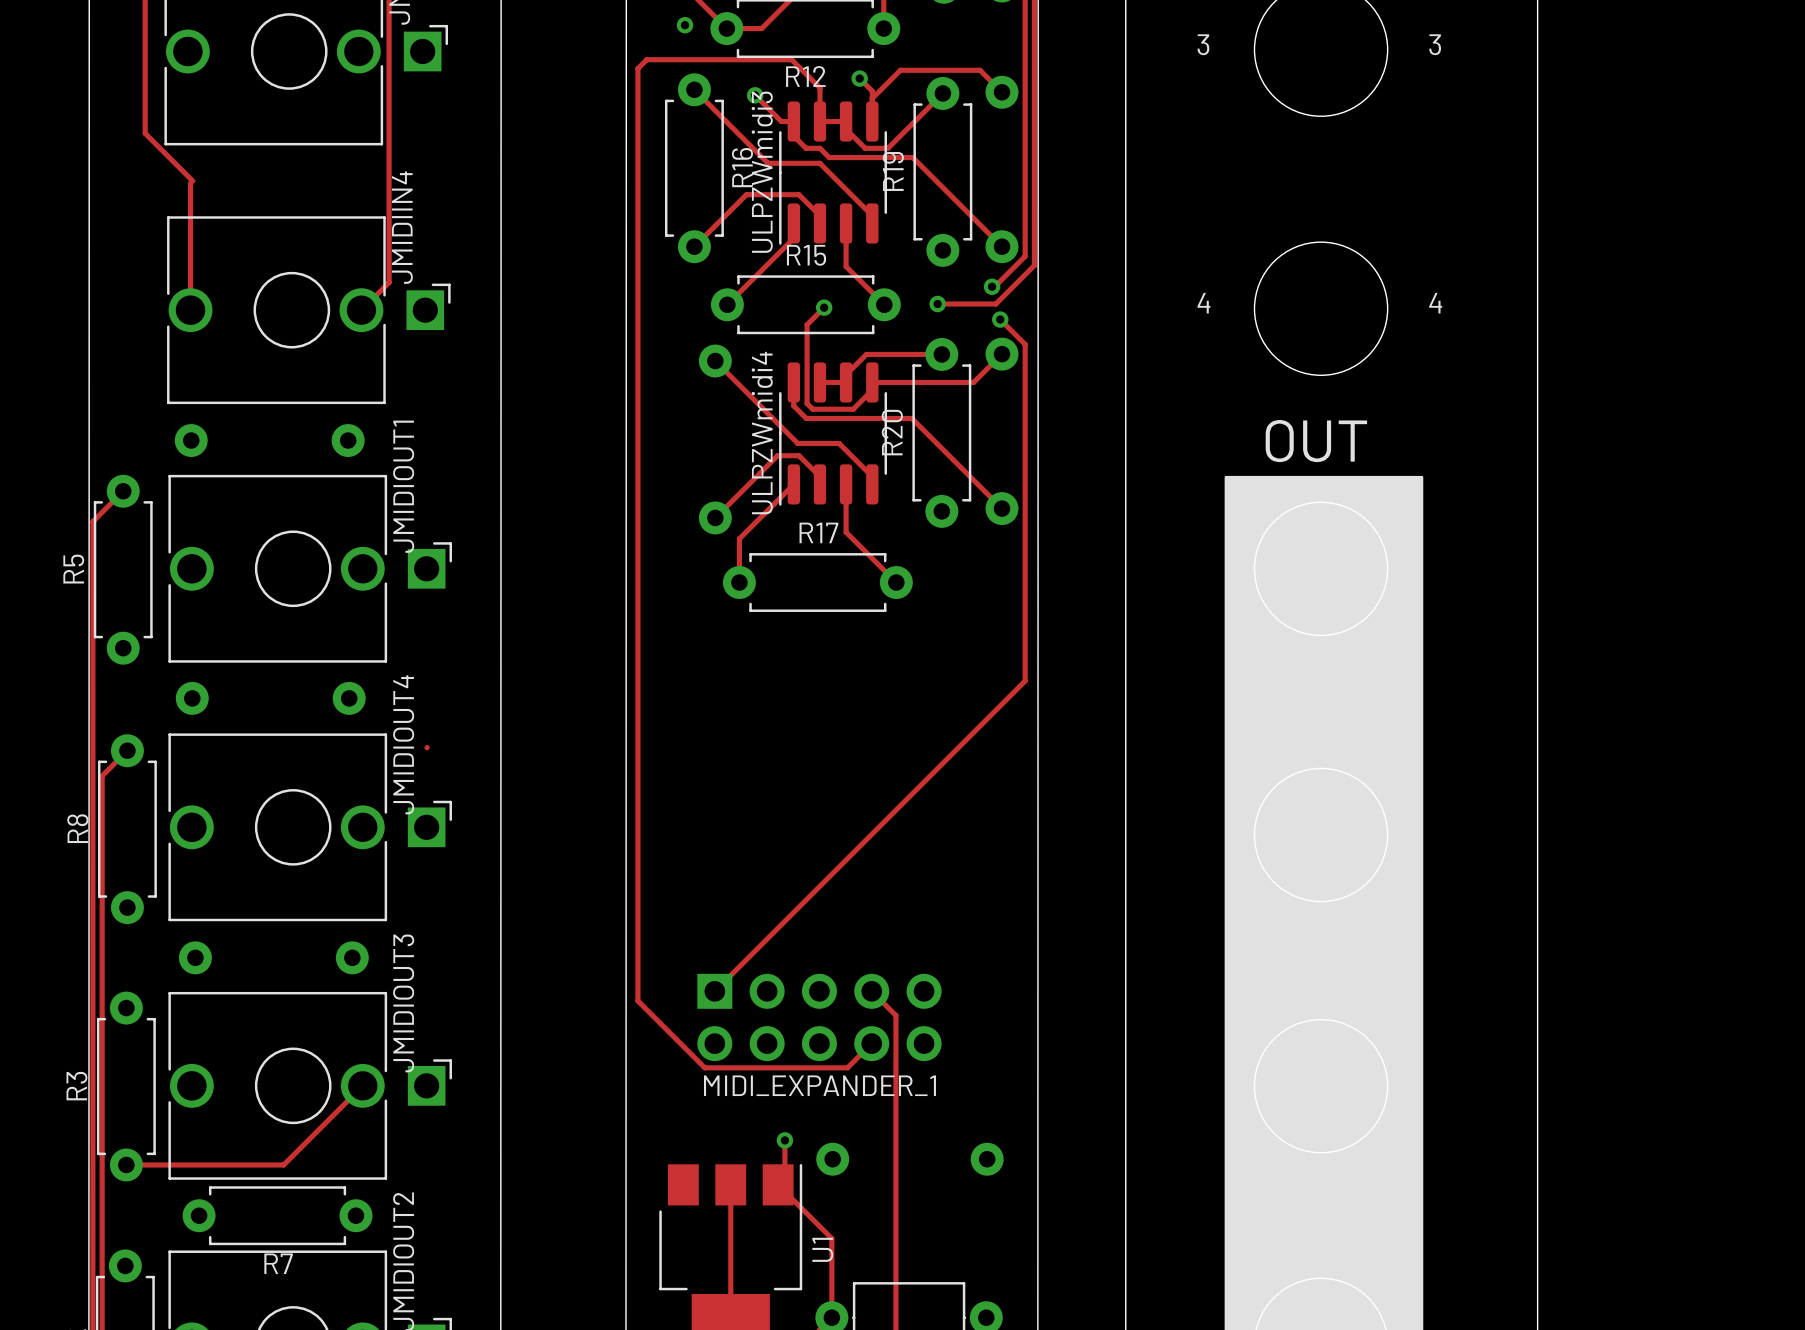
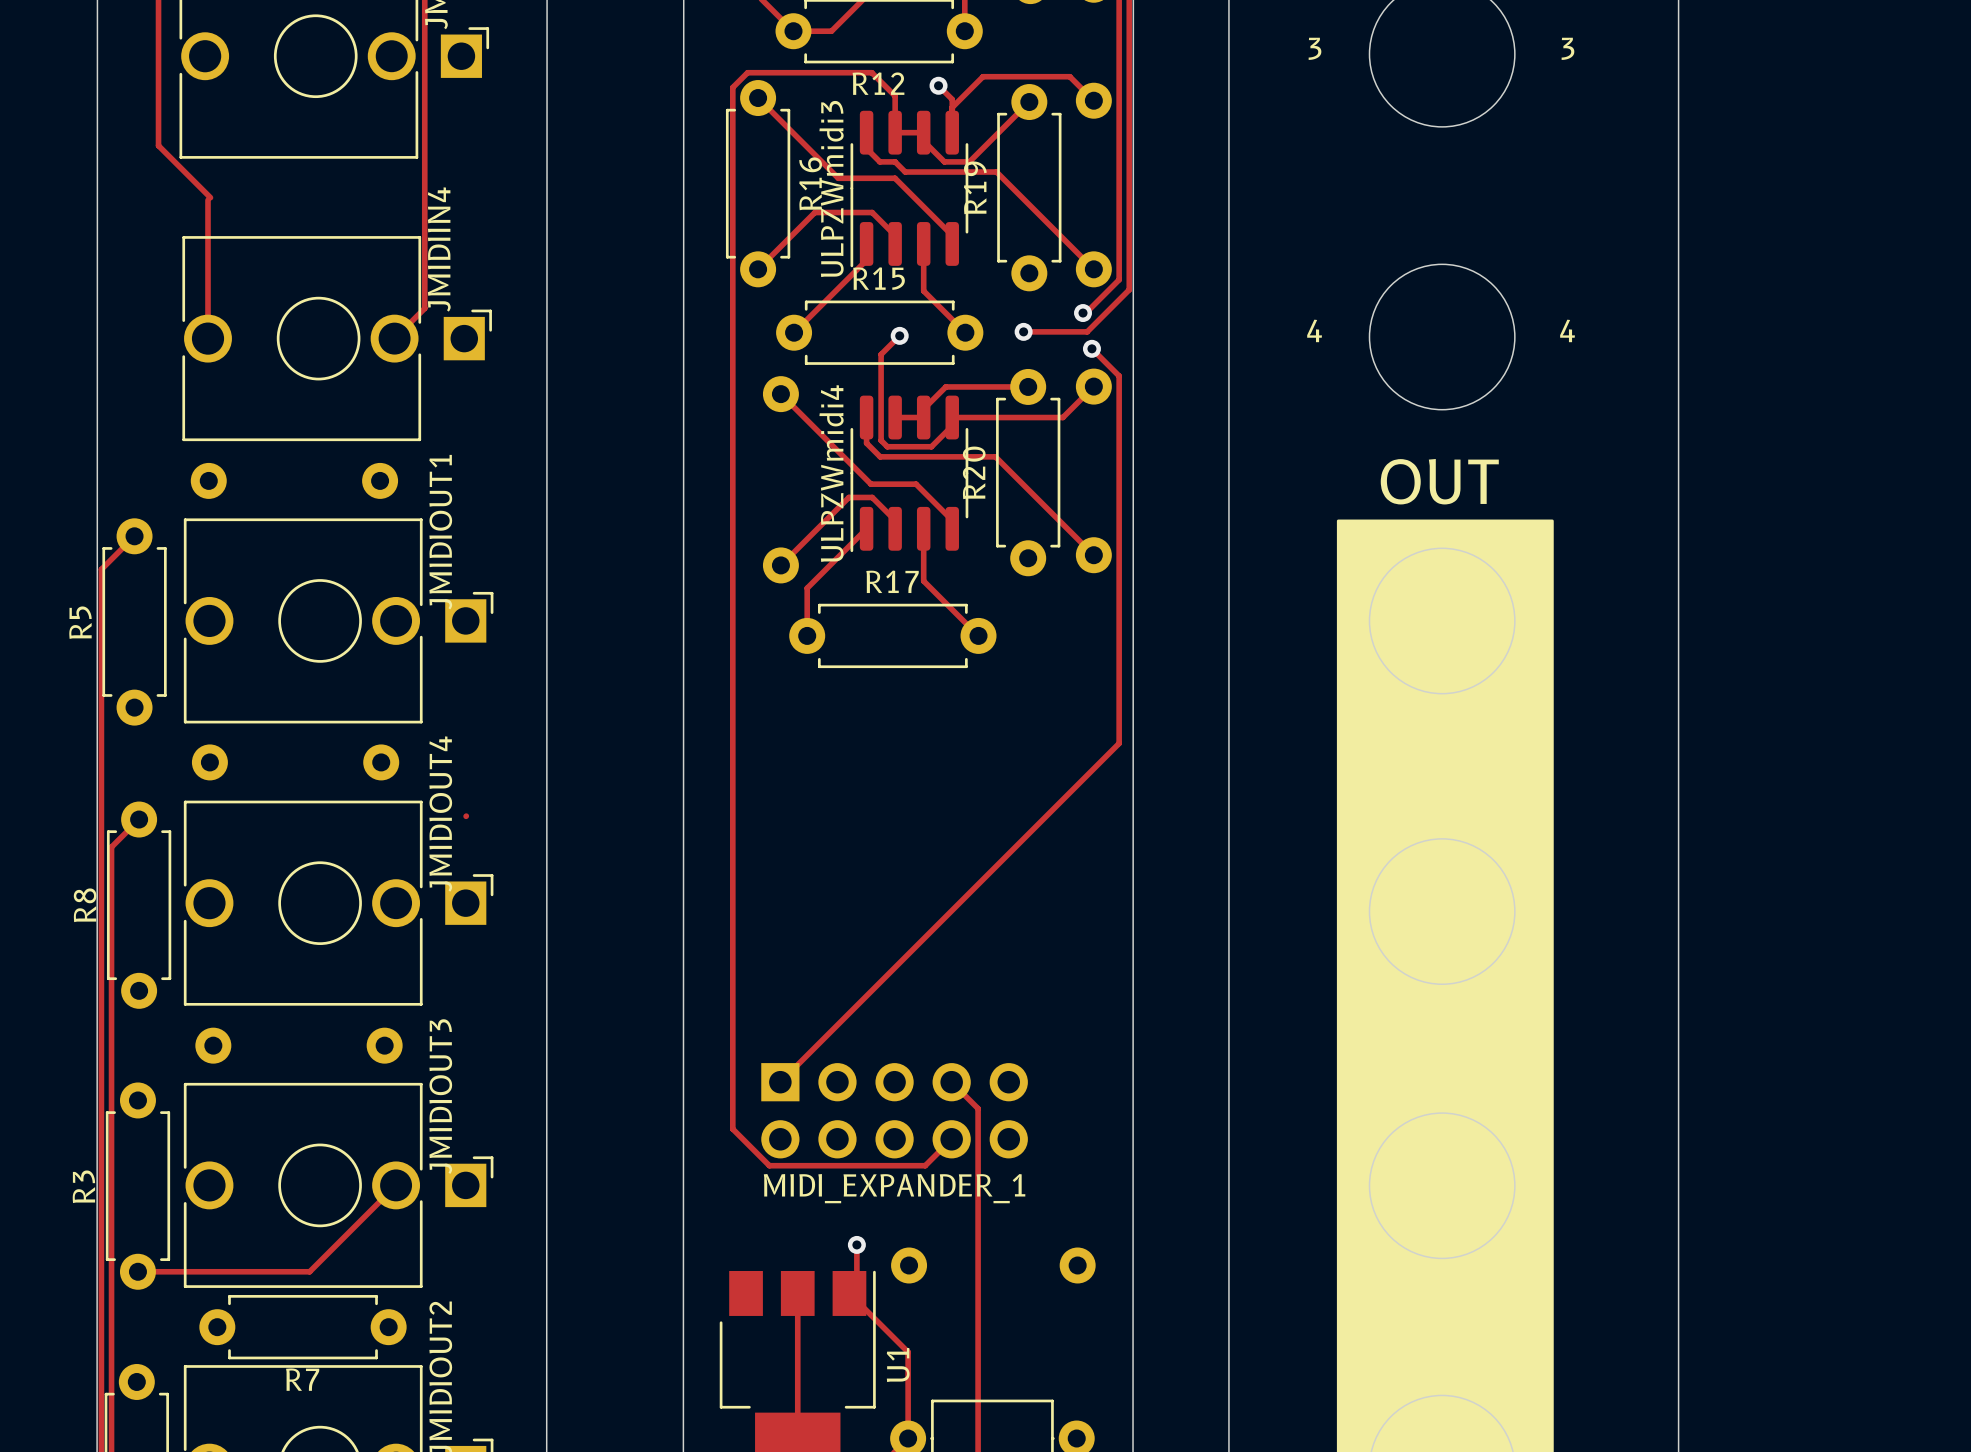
via: (685, 25) -> none
track: (798, 66) (791, 59) (646, 59) (637, 68) (637, 1000) (671, 1034) -> (871, 72) (747, 72) (732, 87) (732, 1129)
track: (755, 95) (781, 121) (793, 121) -> none
via: (755, 95) -> none

